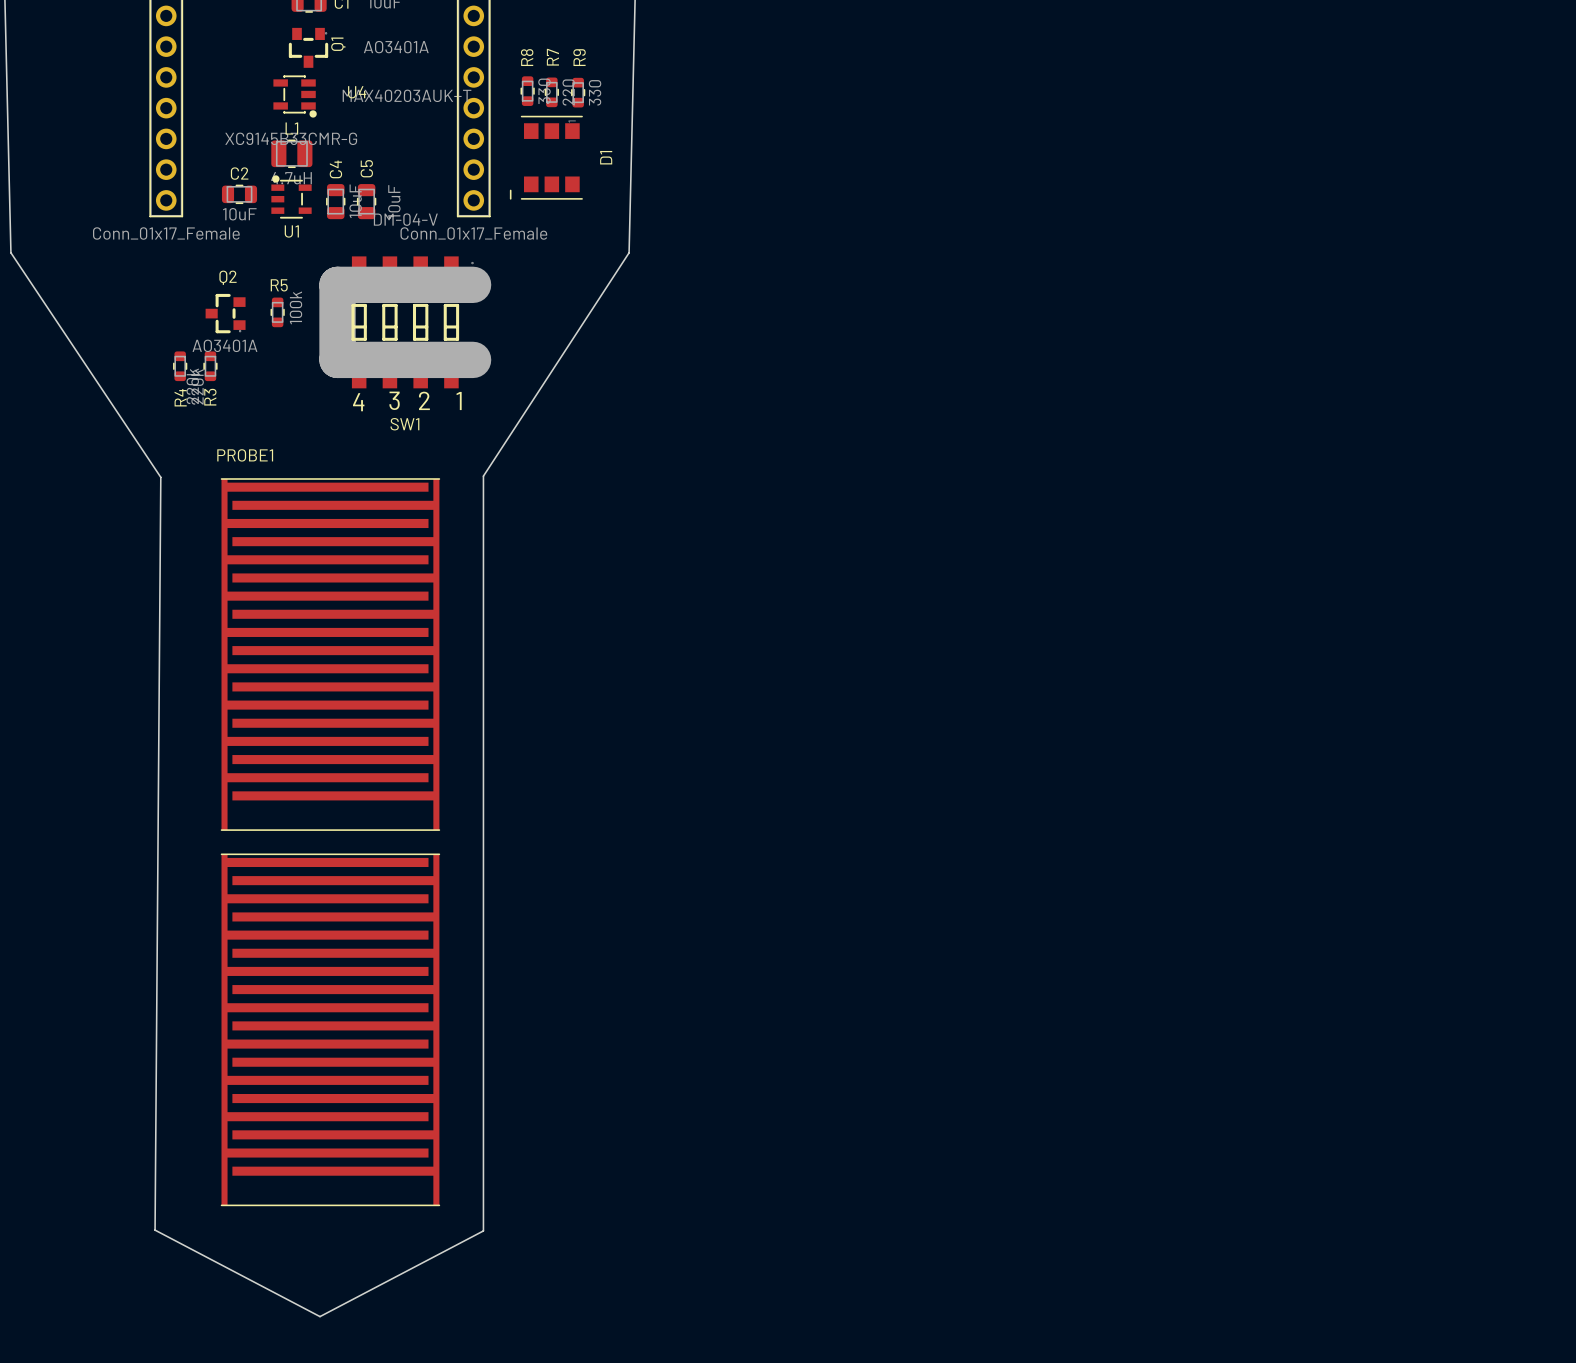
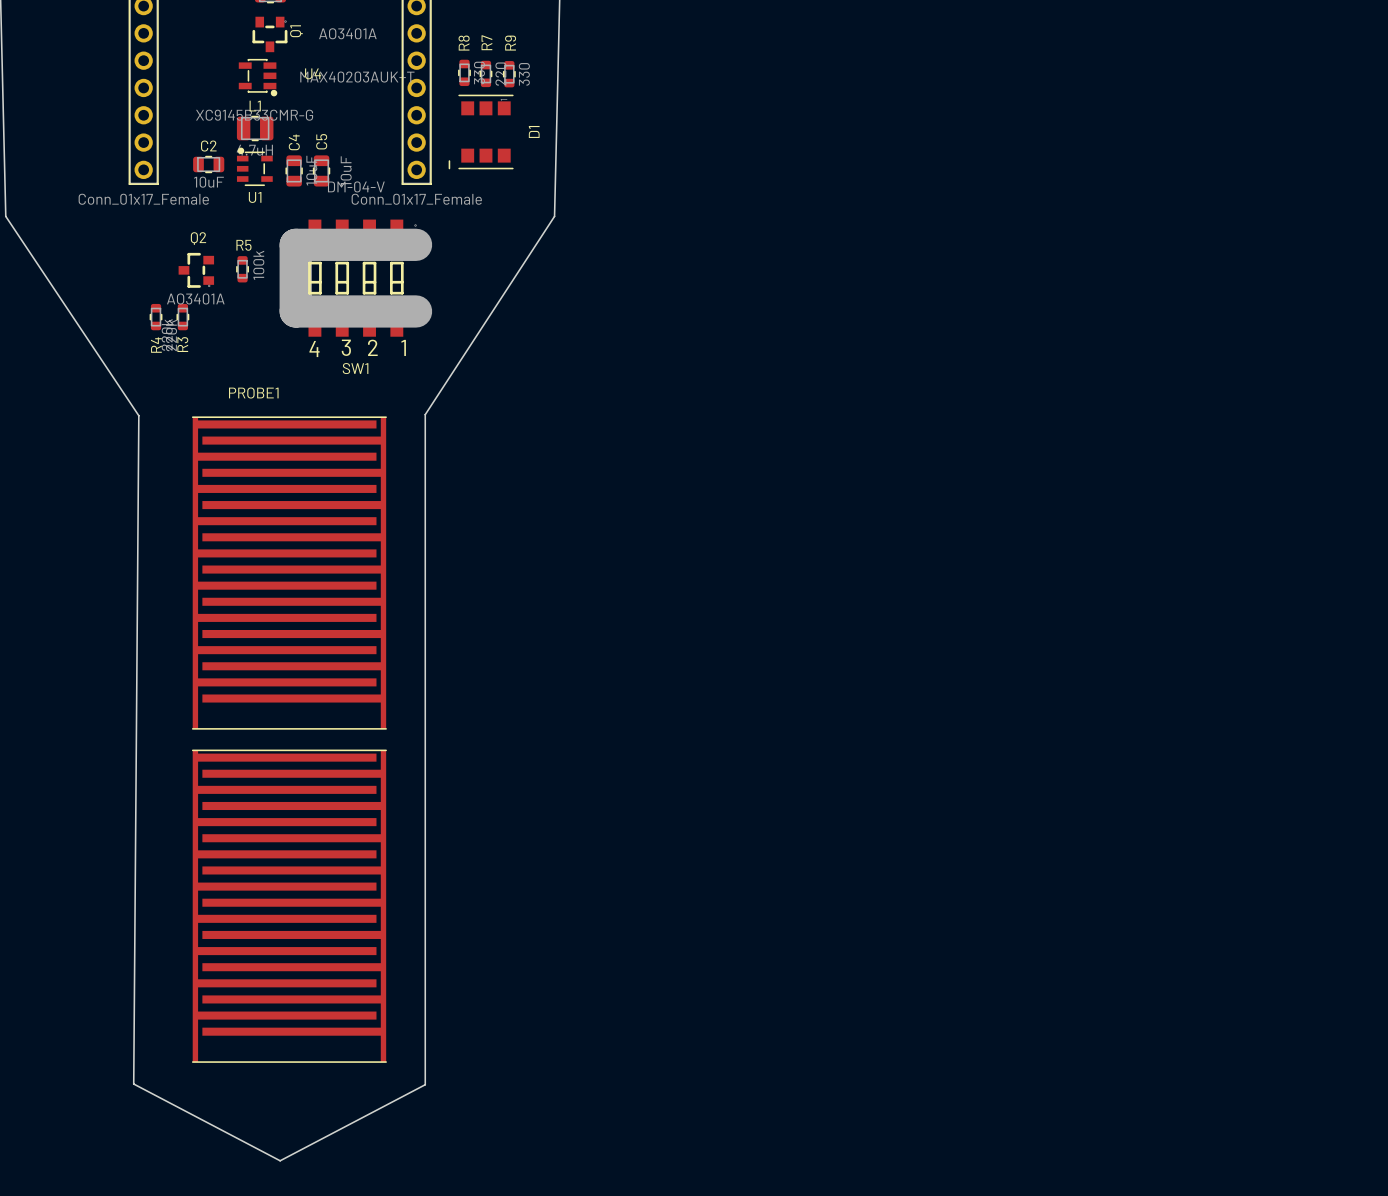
PROBE1 name position: PROBE1 (245, 455) -> PROBE1 (253, 393)

